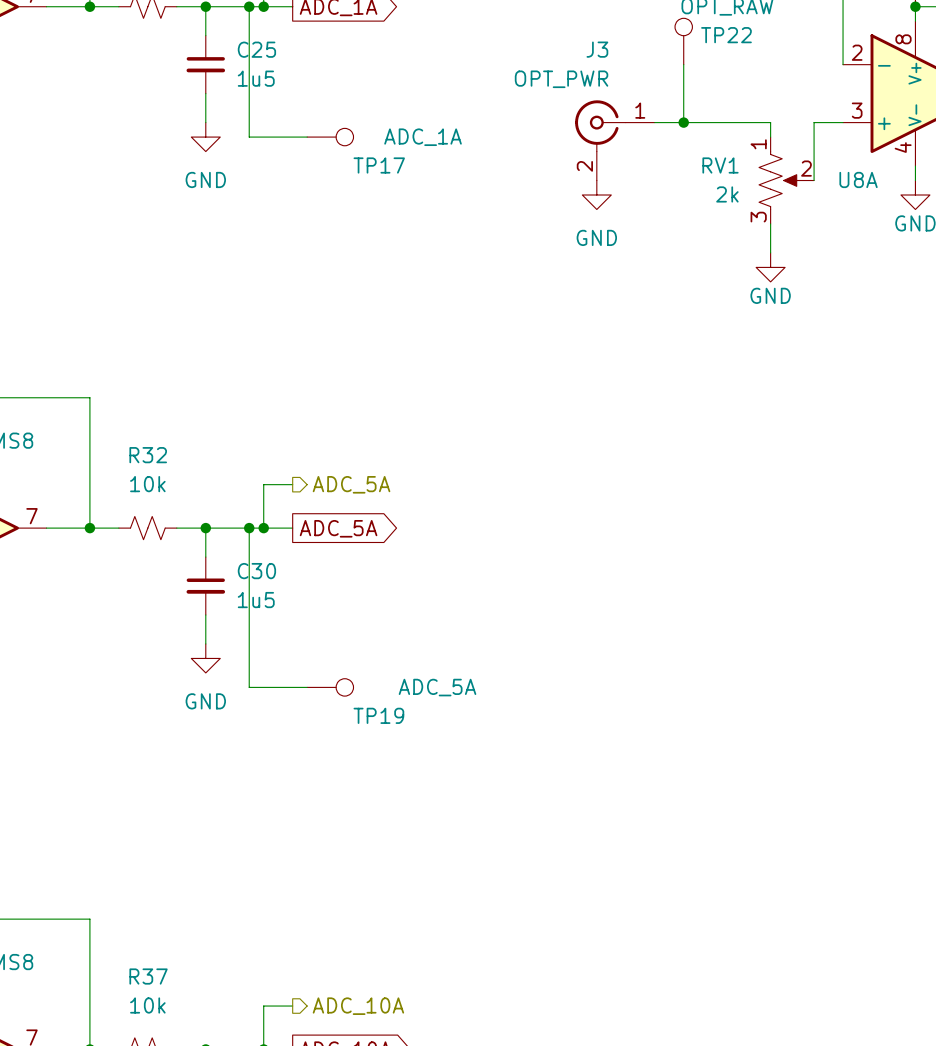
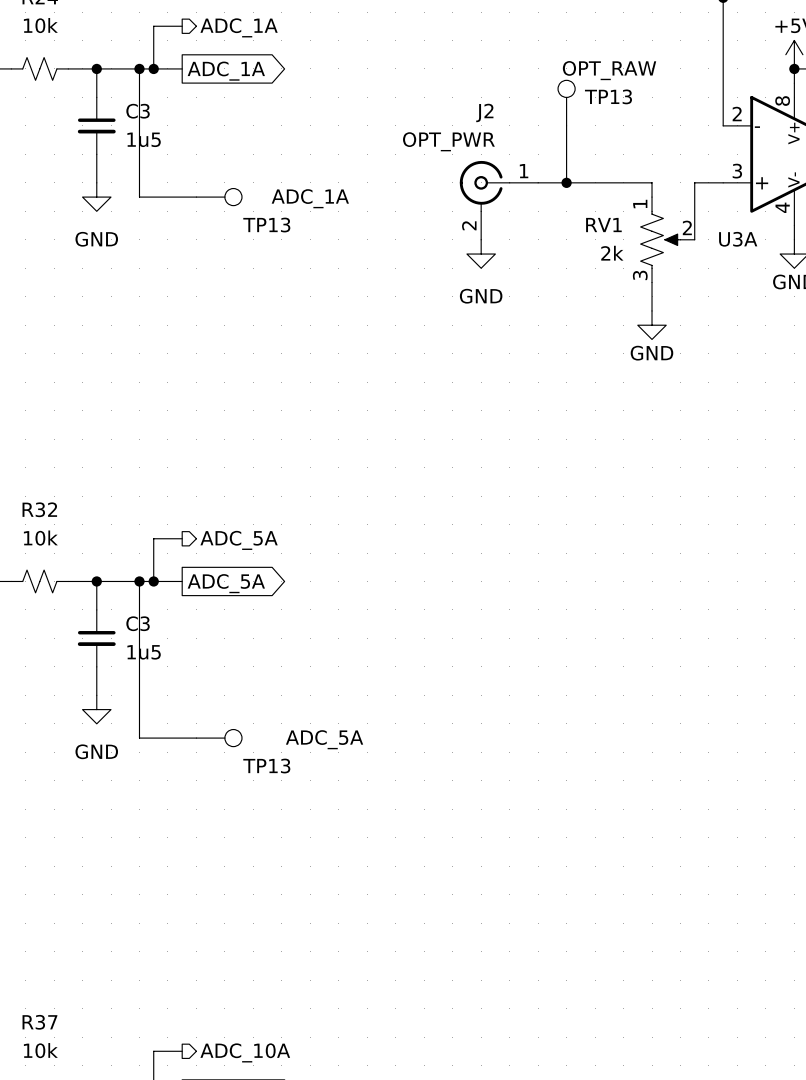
TP22 name: TP22 (726, 35) -> TP13 (608, 96)
C25 name: C25 (256, 49) -> C3 (138, 111)
J3 name: J3 (597, 49) -> J2 (484, 112)
TP17 name: TP17 (379, 165) -> TP13 (266, 225)
U8A name: U8A (858, 179) -> U3A (738, 239)
C30 name: C30 (256, 571) -> C3 (138, 623)
TP19 name: TP19 (378, 715) -> TP13 (266, 766)

